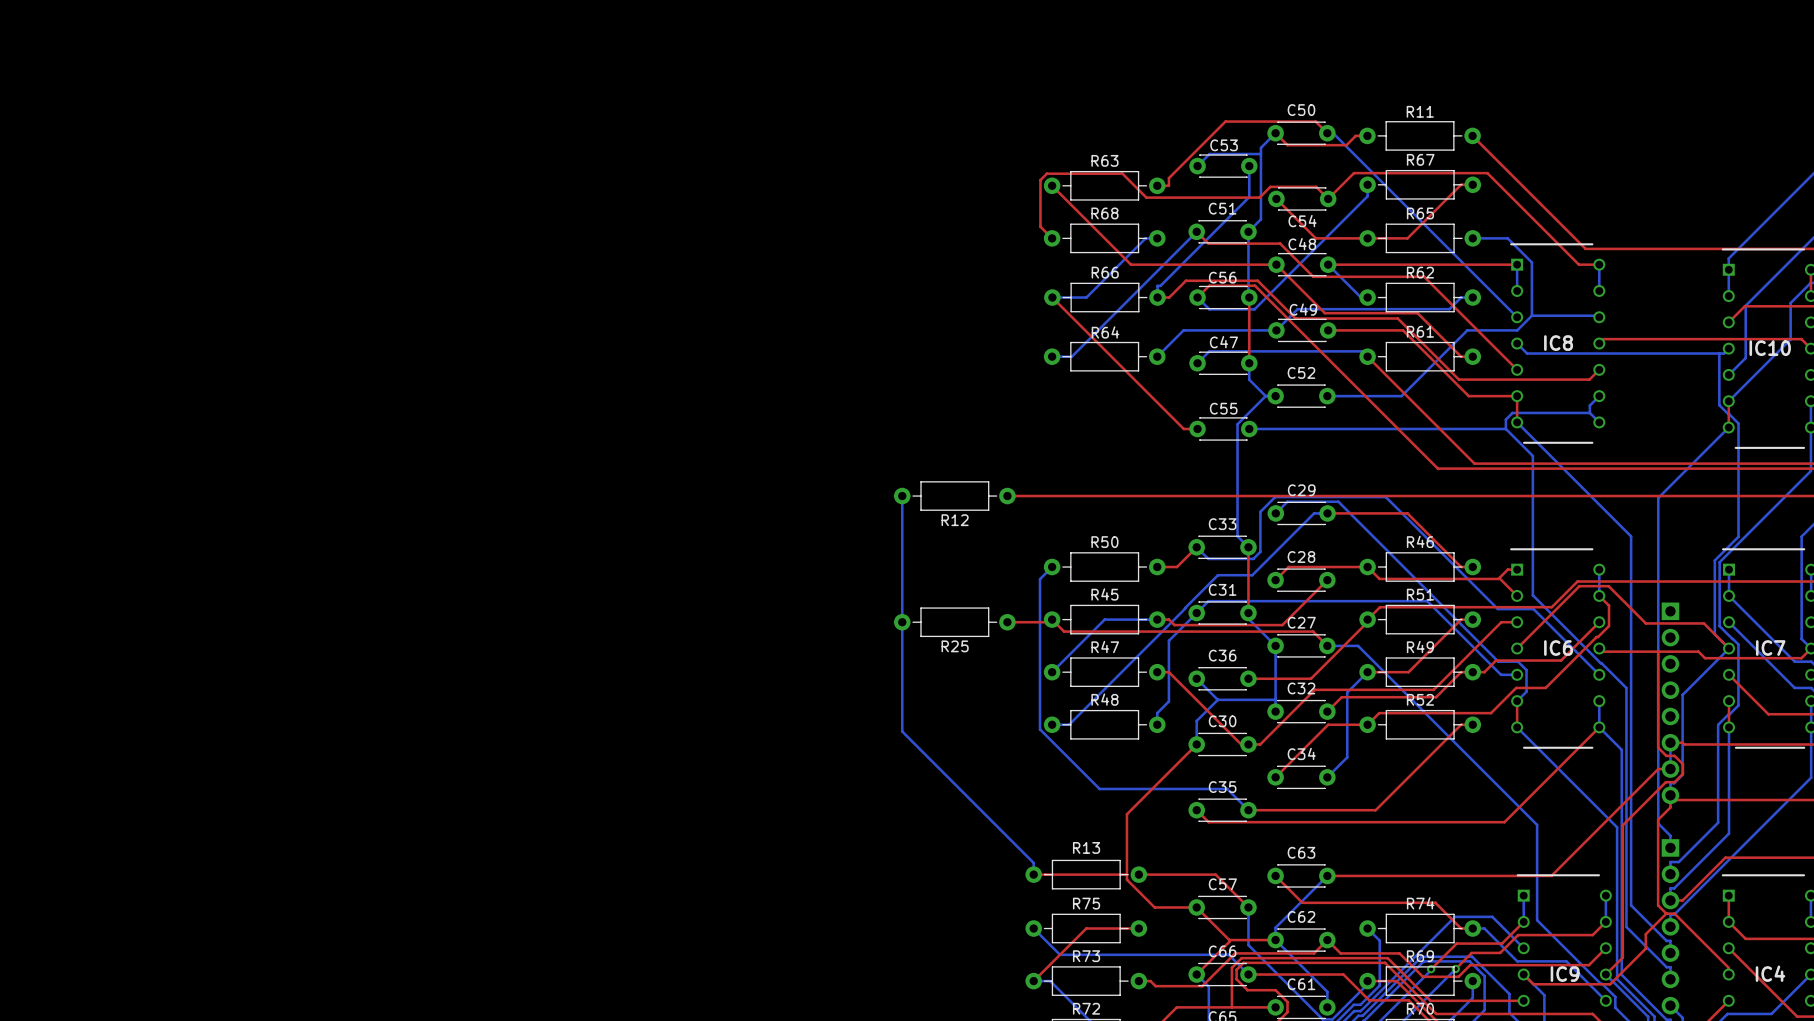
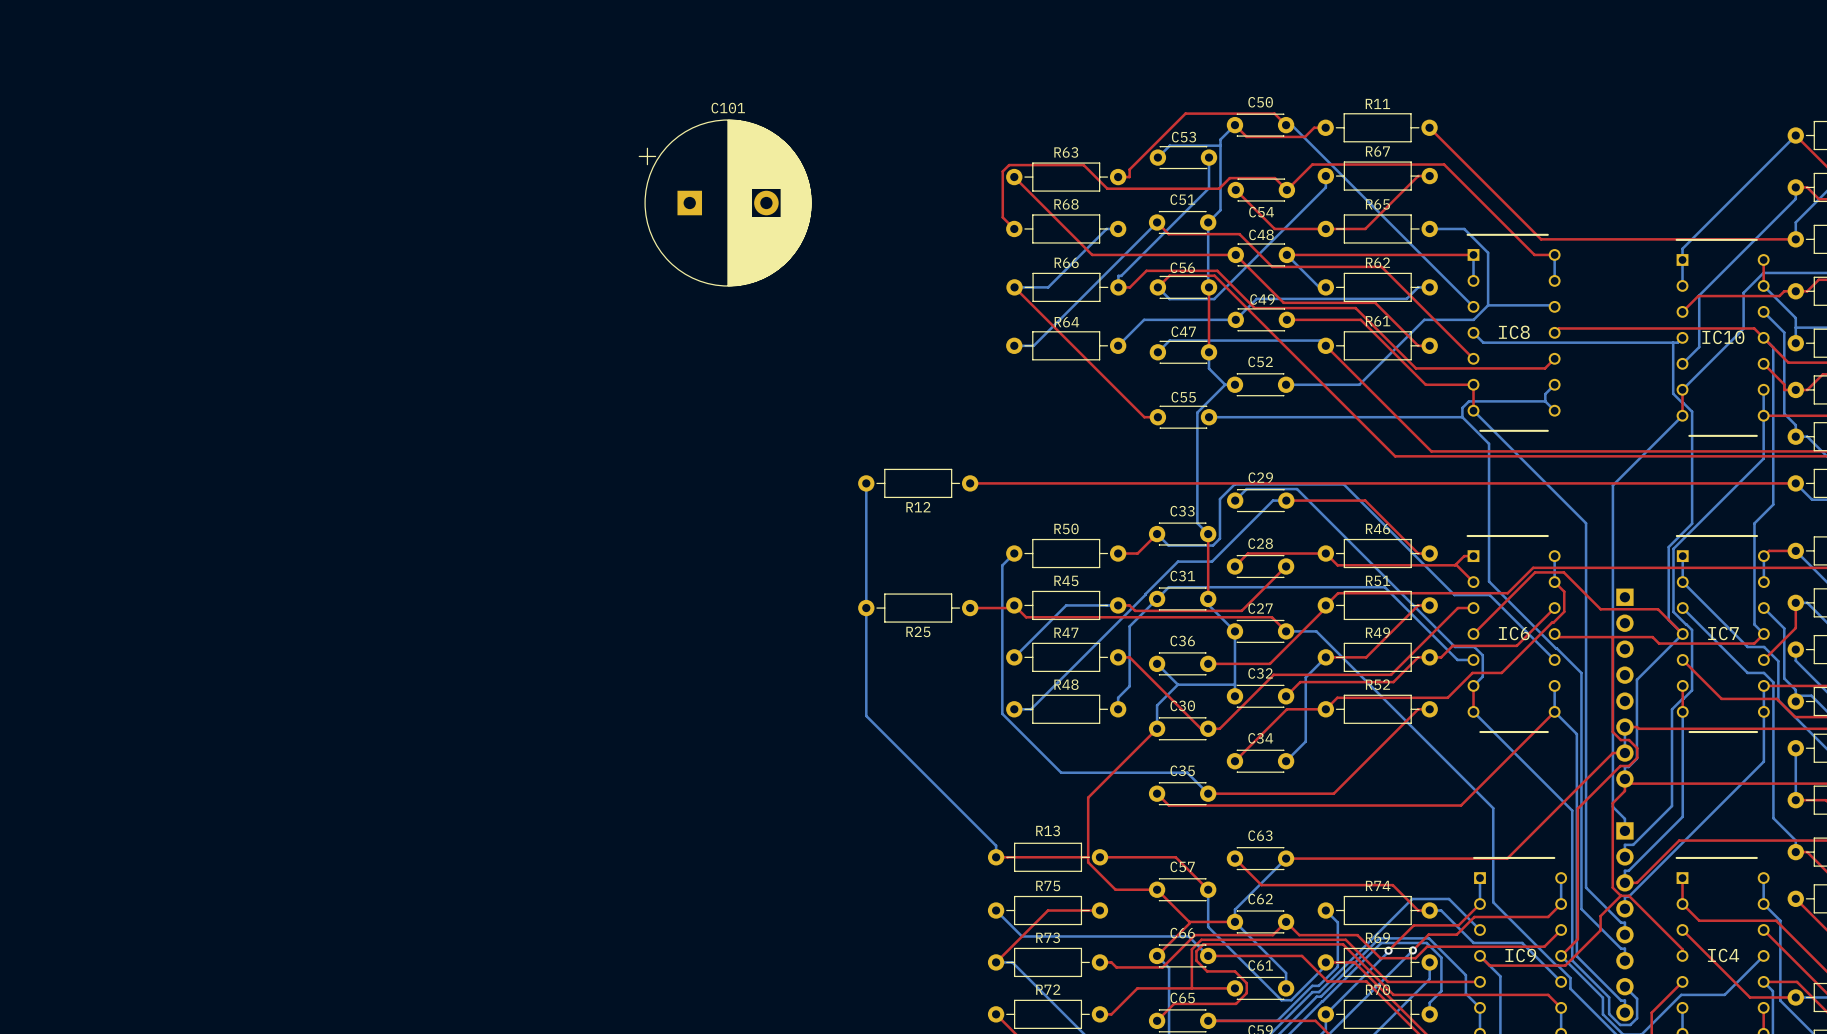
C101: none -> (725, 203)

